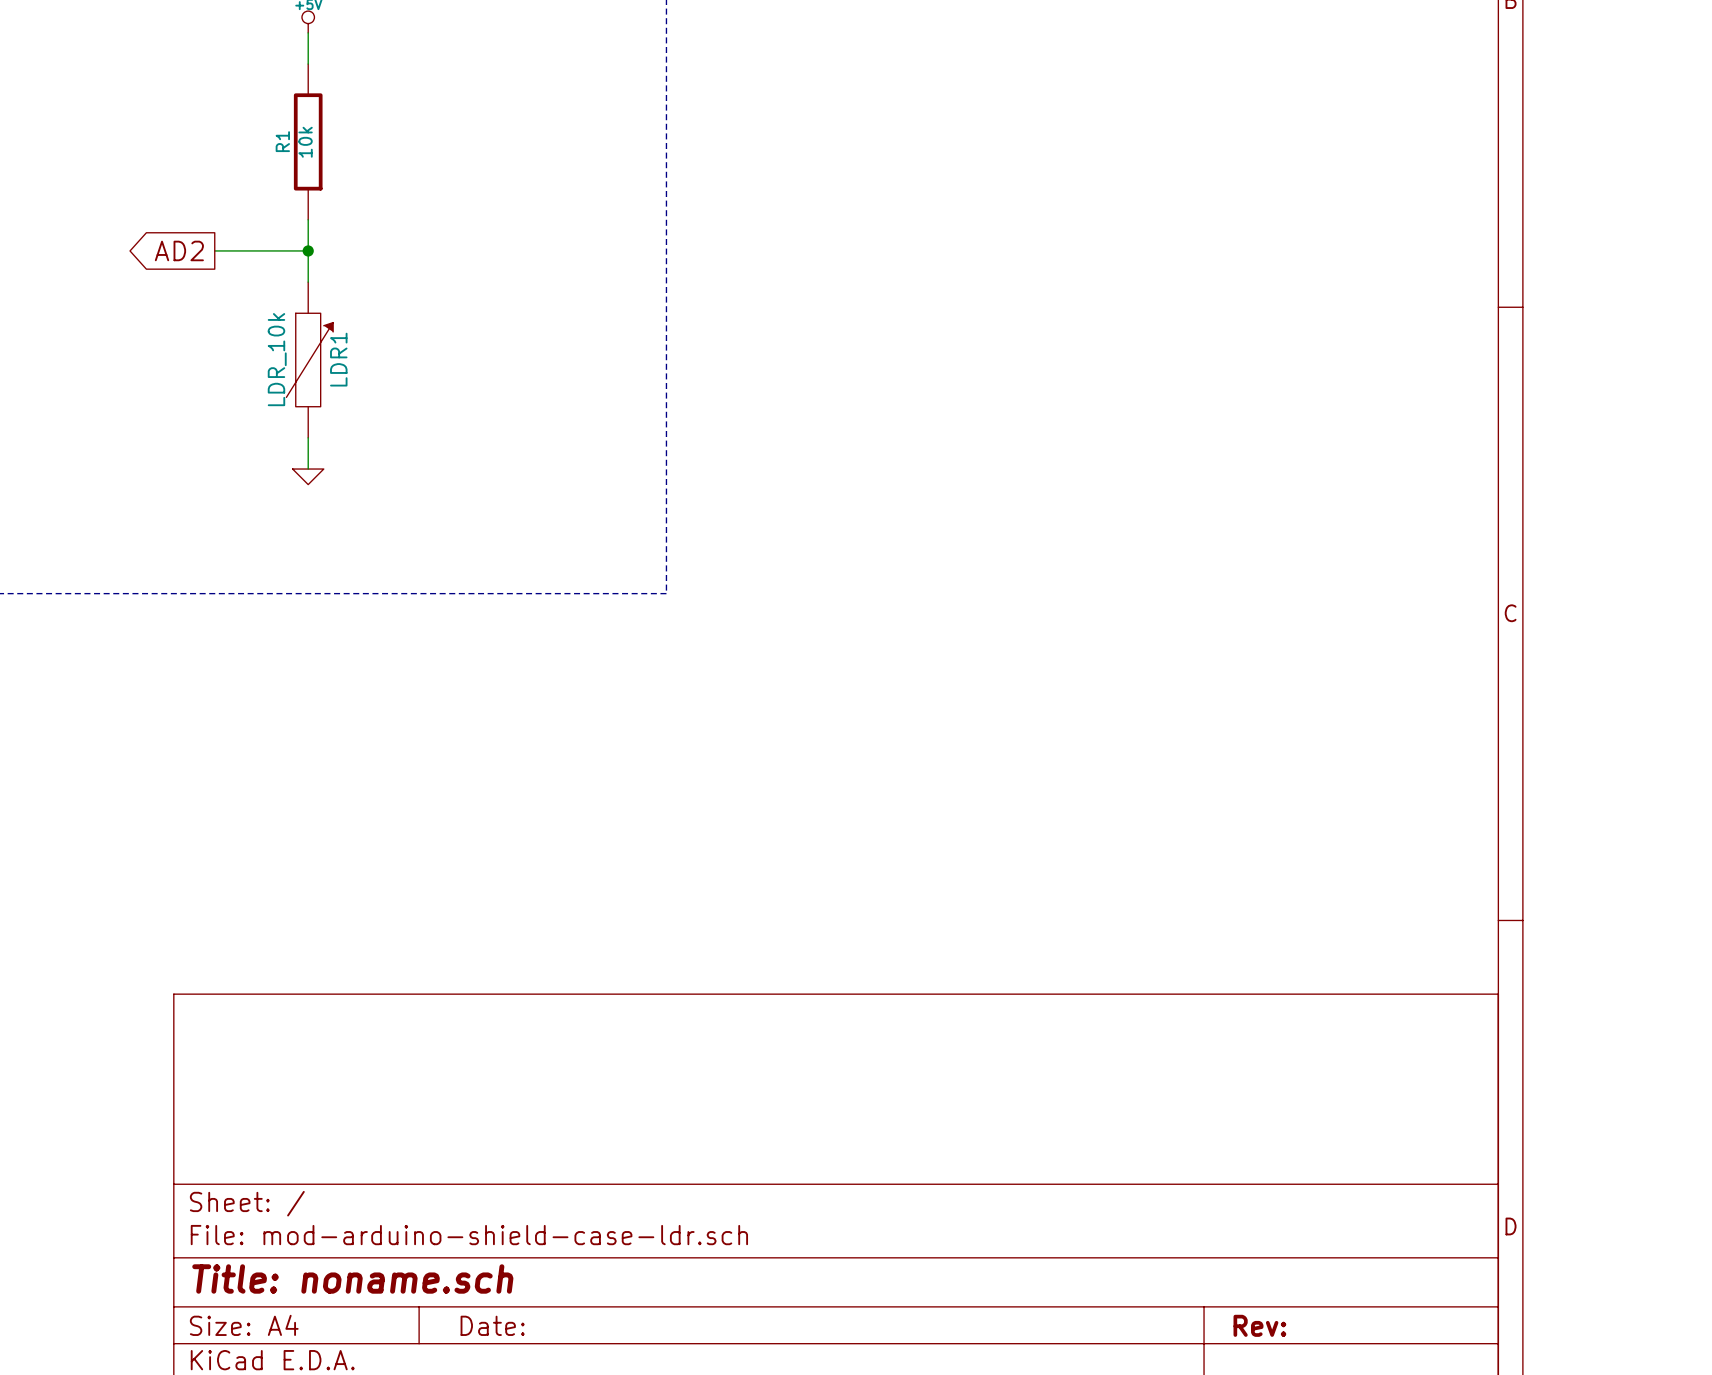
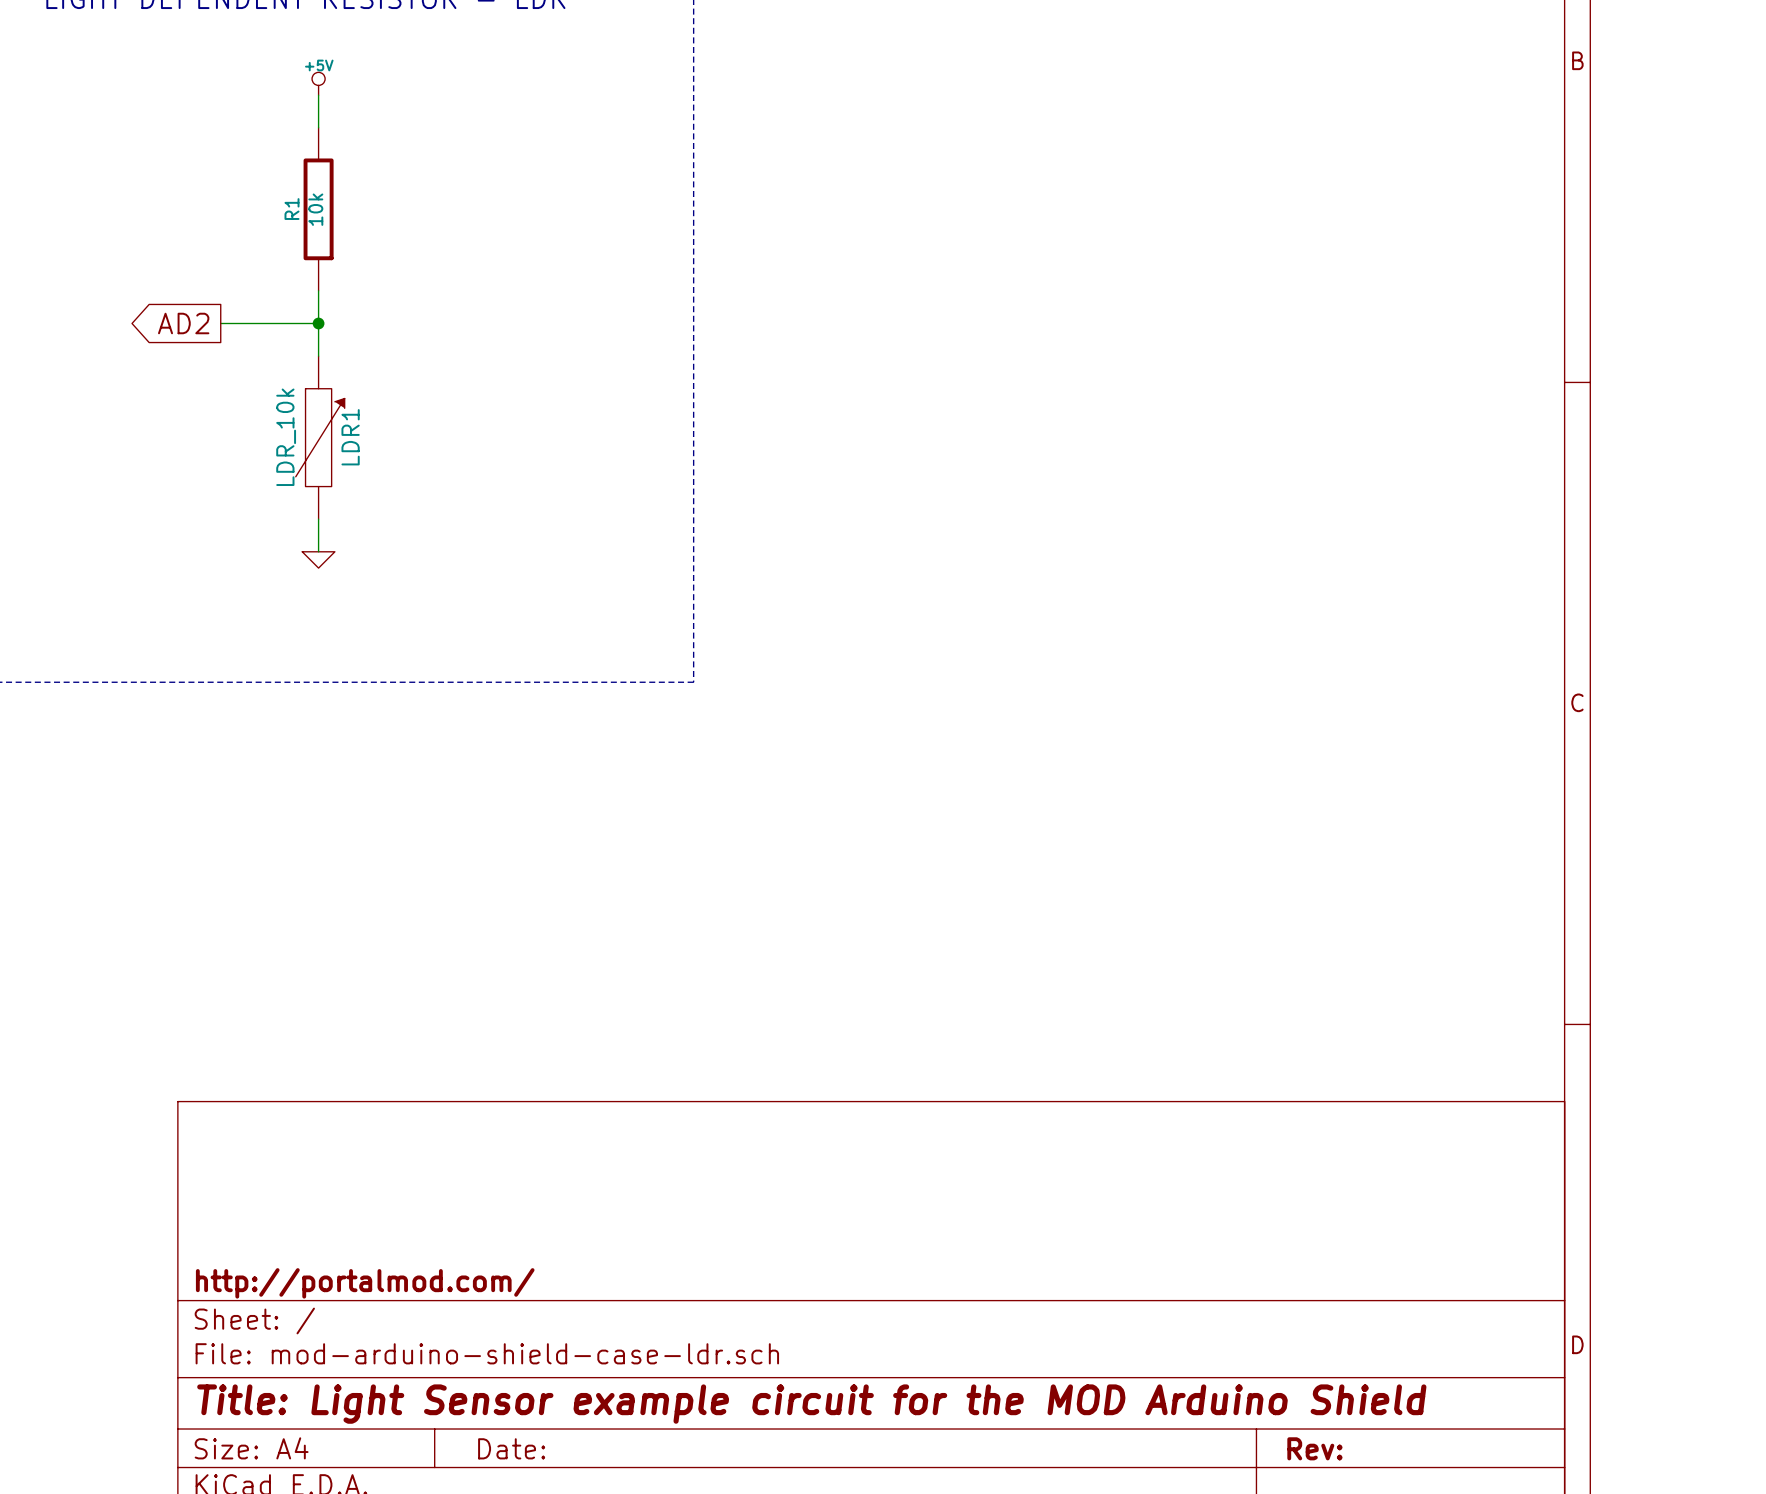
title block: none -> http://portalmod.com/ (365, 1283)
title block: Title: noname.sch (352, 1278) -> Title: Light Sensor example circuit for the MOD Arduino Shield (811, 1404)

